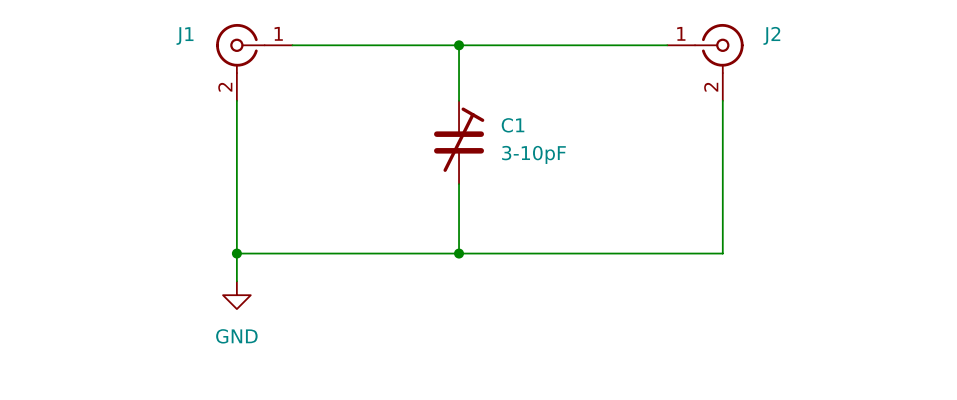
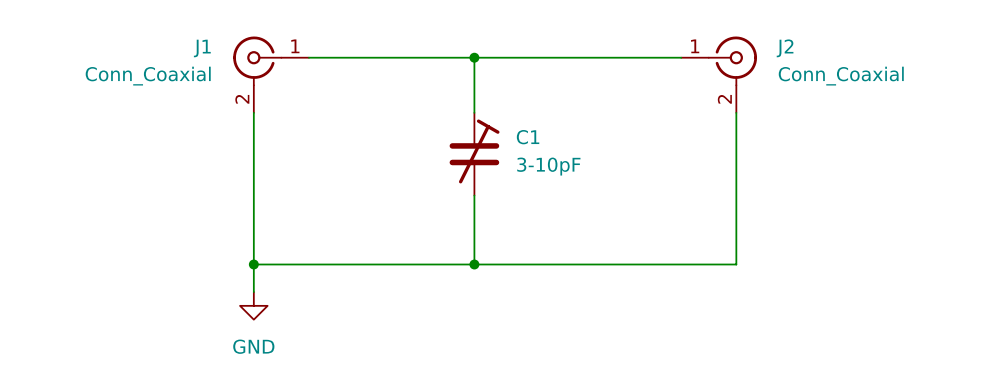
J1 value: none -> Conn_Coaxial (148, 76)
J2 value: none -> Conn_Coaxial (841, 76)

